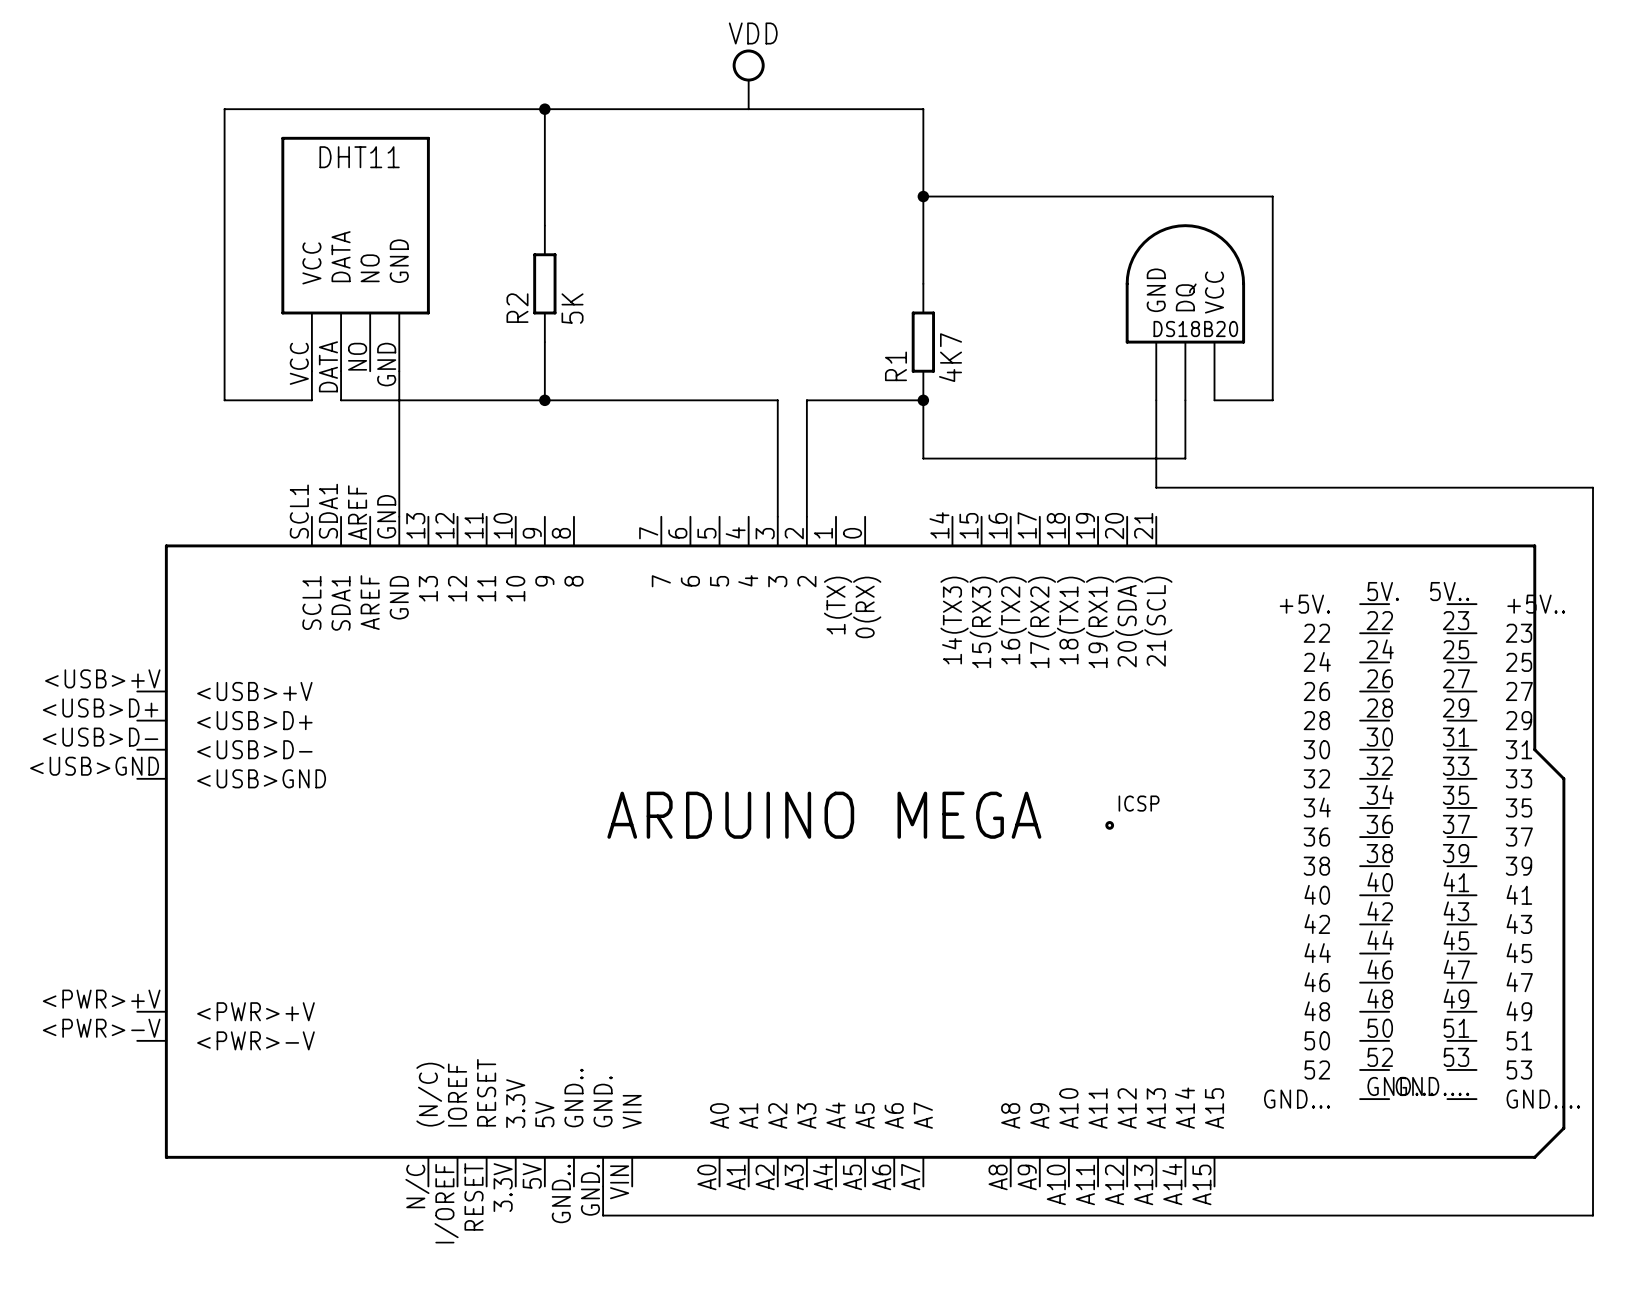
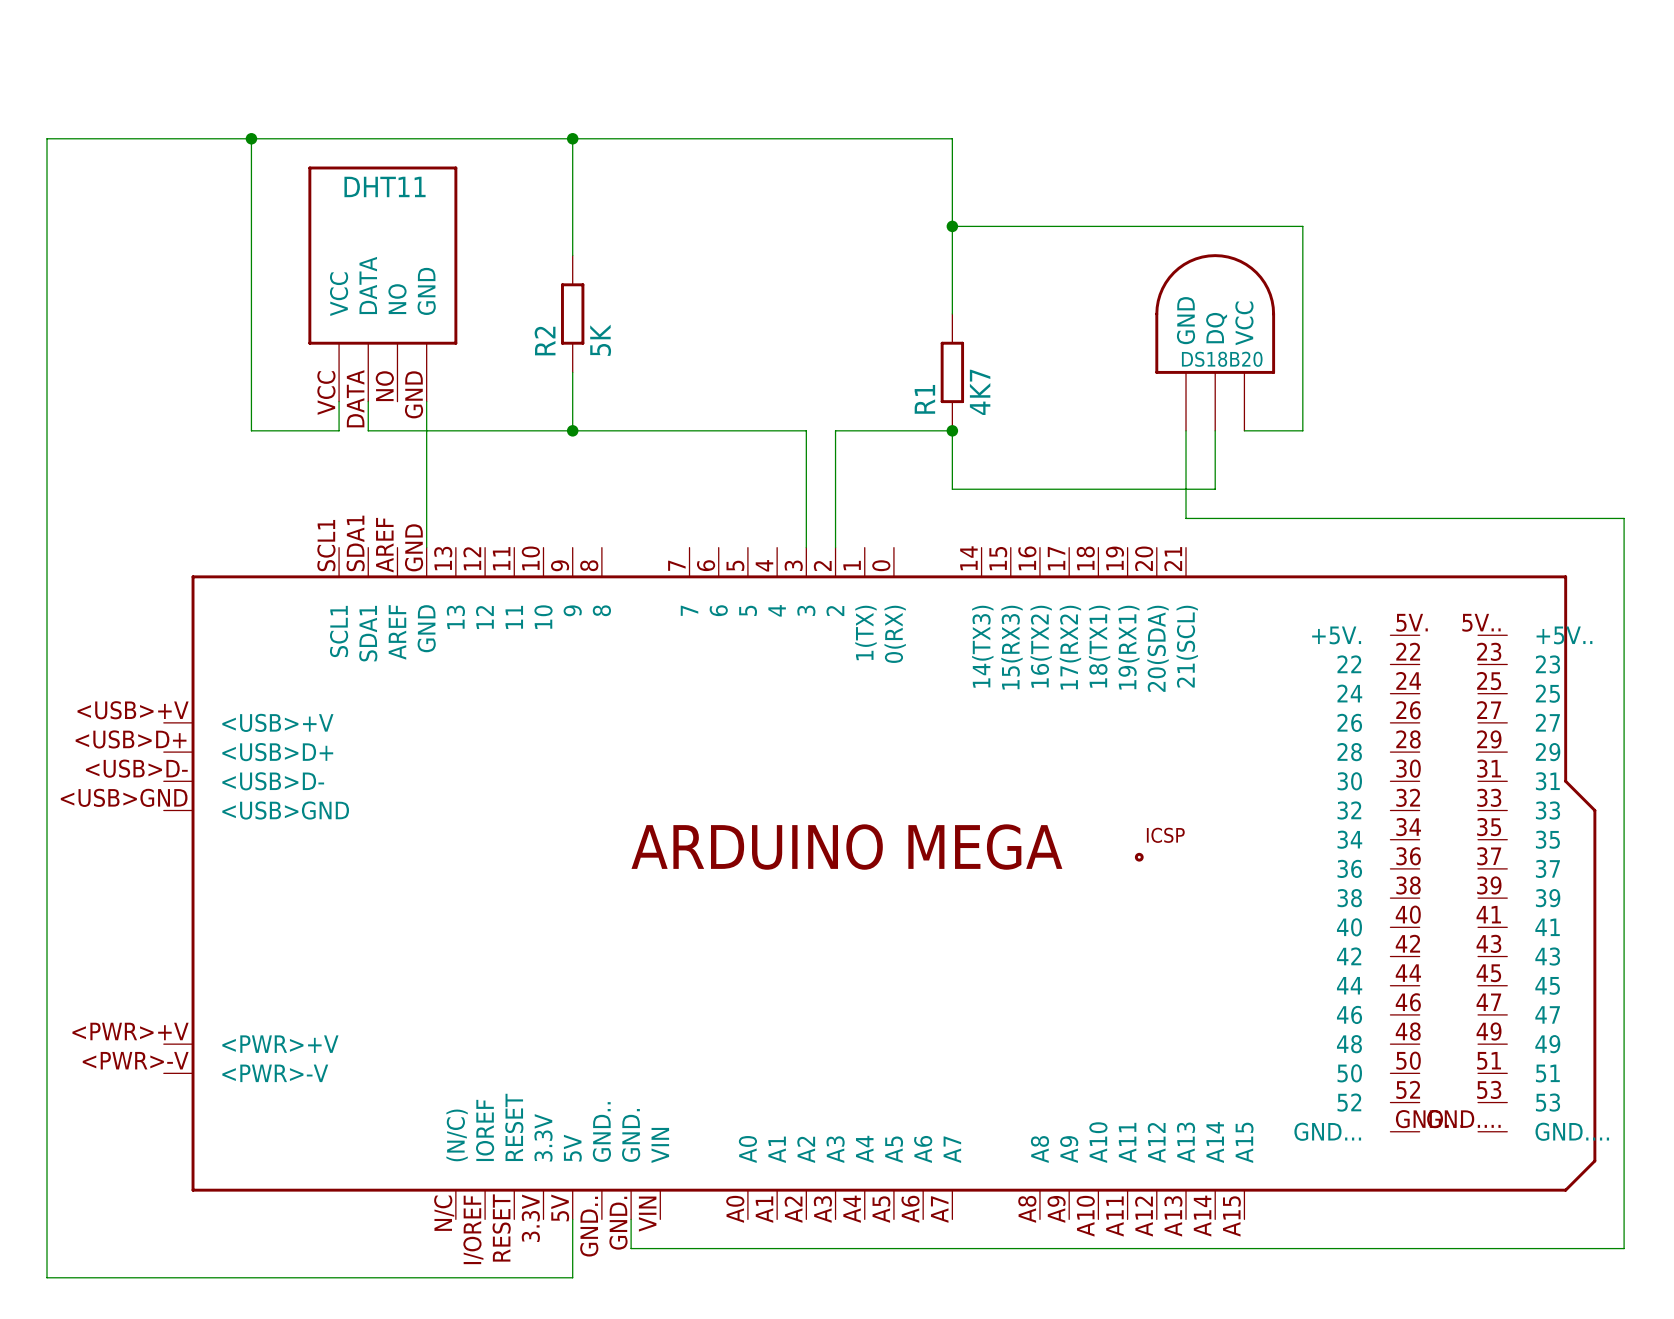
power symbol: VDD (748, 79) -> none
wire: none -> (251, 138) (47, 138) (47, 1277) (572, 1277) (572, 1219)
junction: none -> (251, 138)

